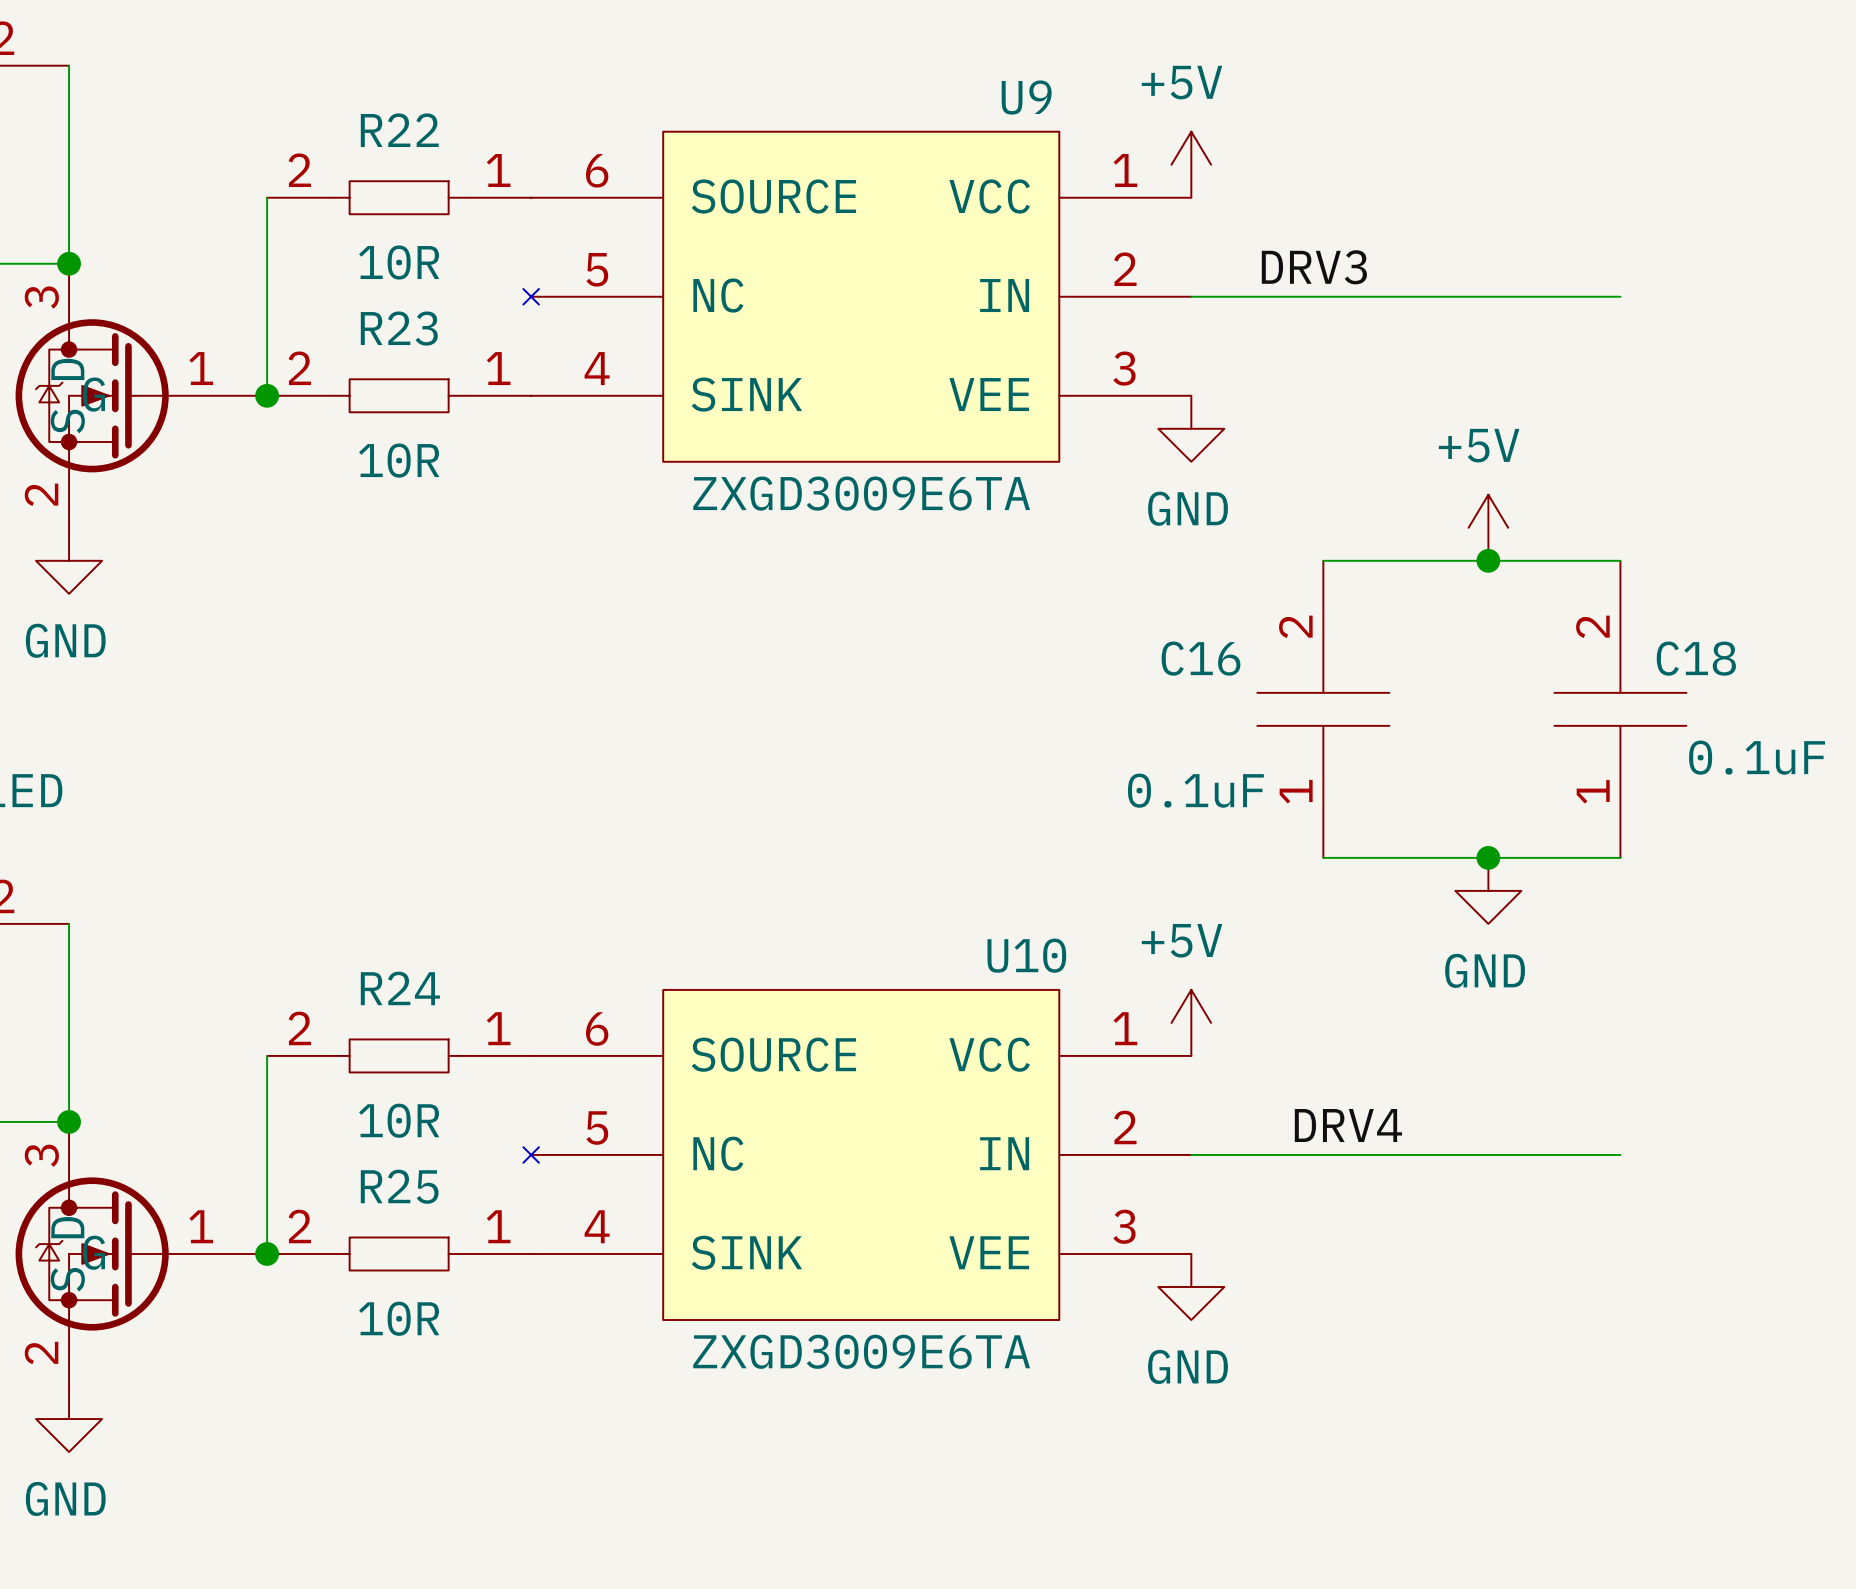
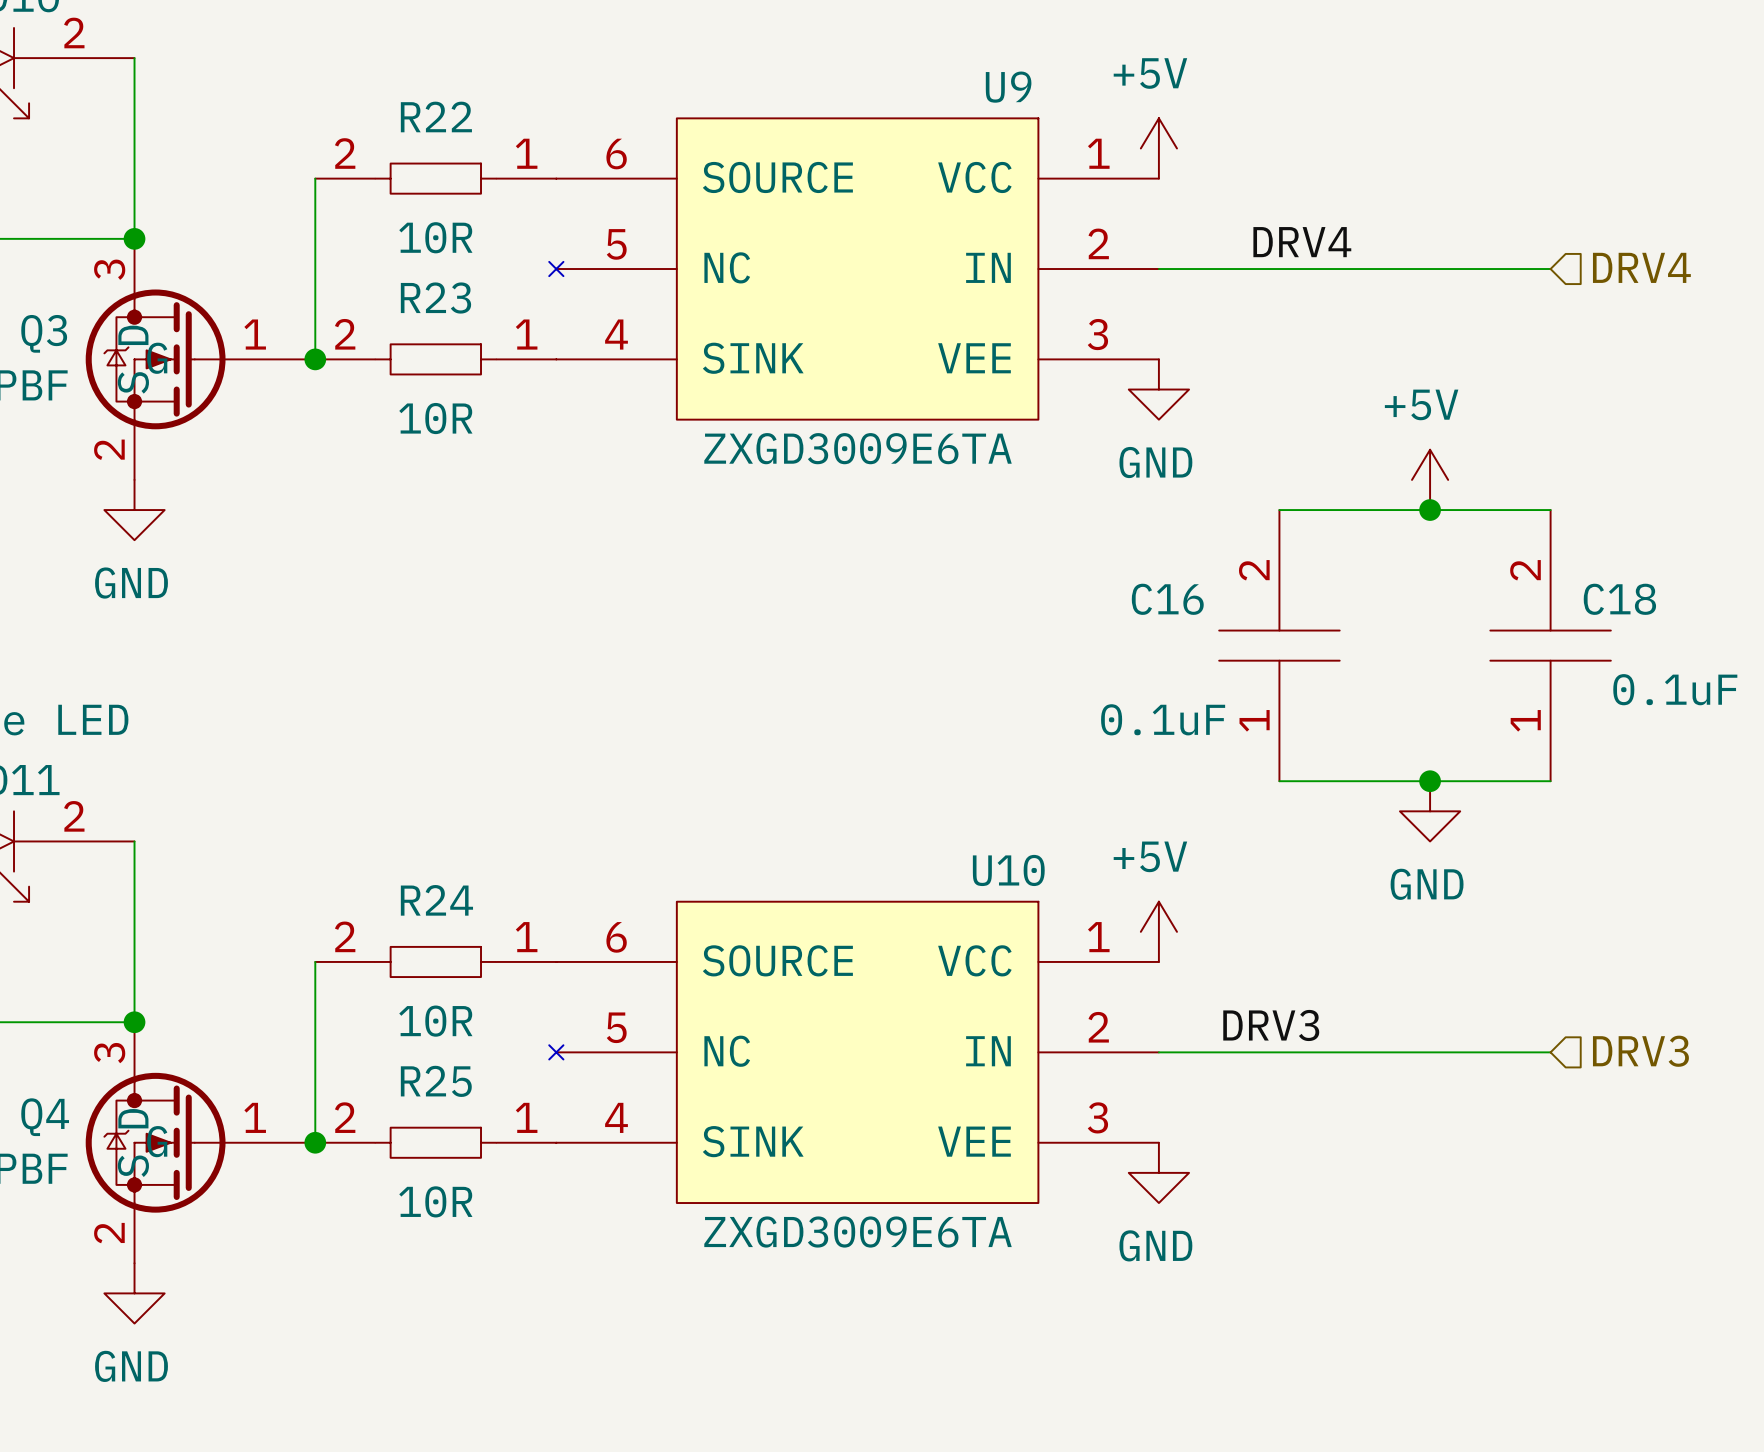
label: DRV3 (1314, 267) -> DRV4 (1302, 242)
hierarchical label: none -> DRV4 (1641, 267)
label: DRV4 (1348, 1125) -> DRV3 (1271, 1025)
hierarchical label: none -> DRV3 (1640, 1051)

